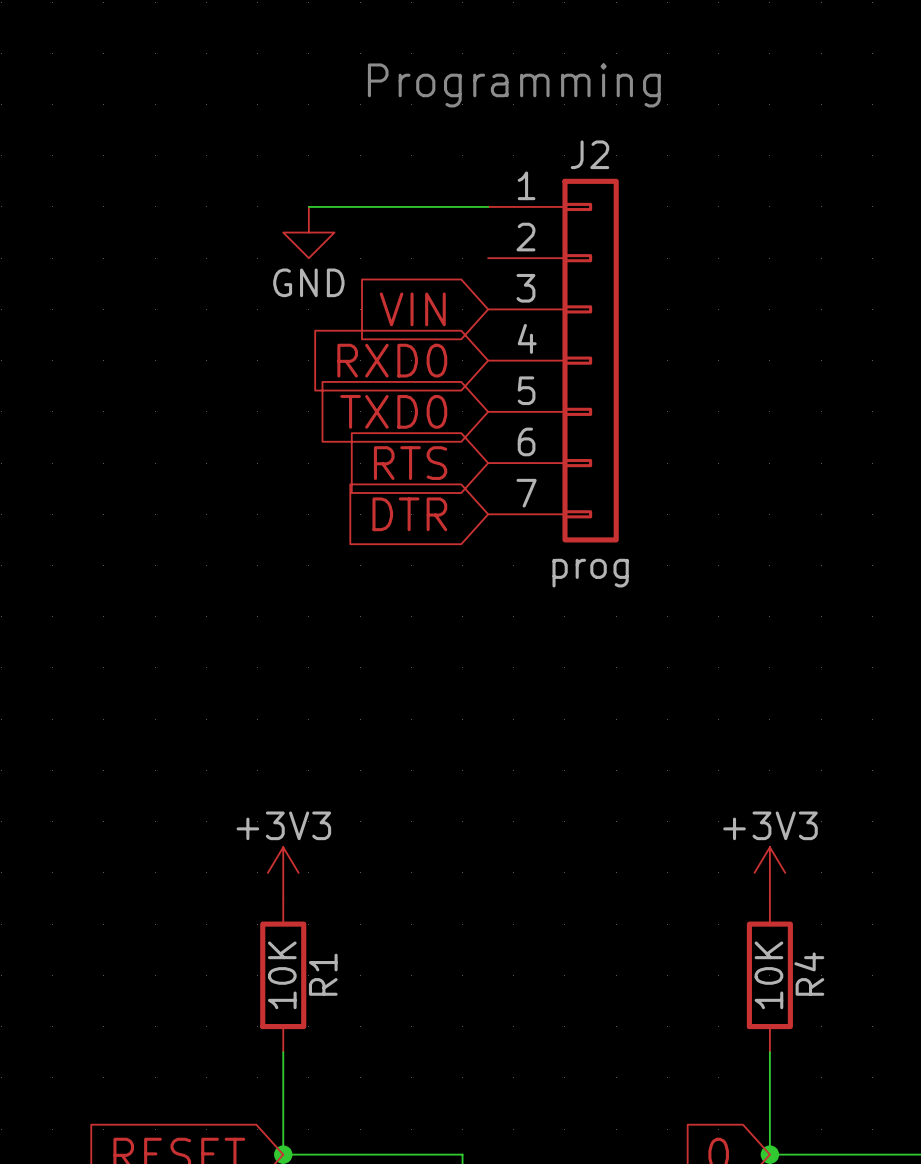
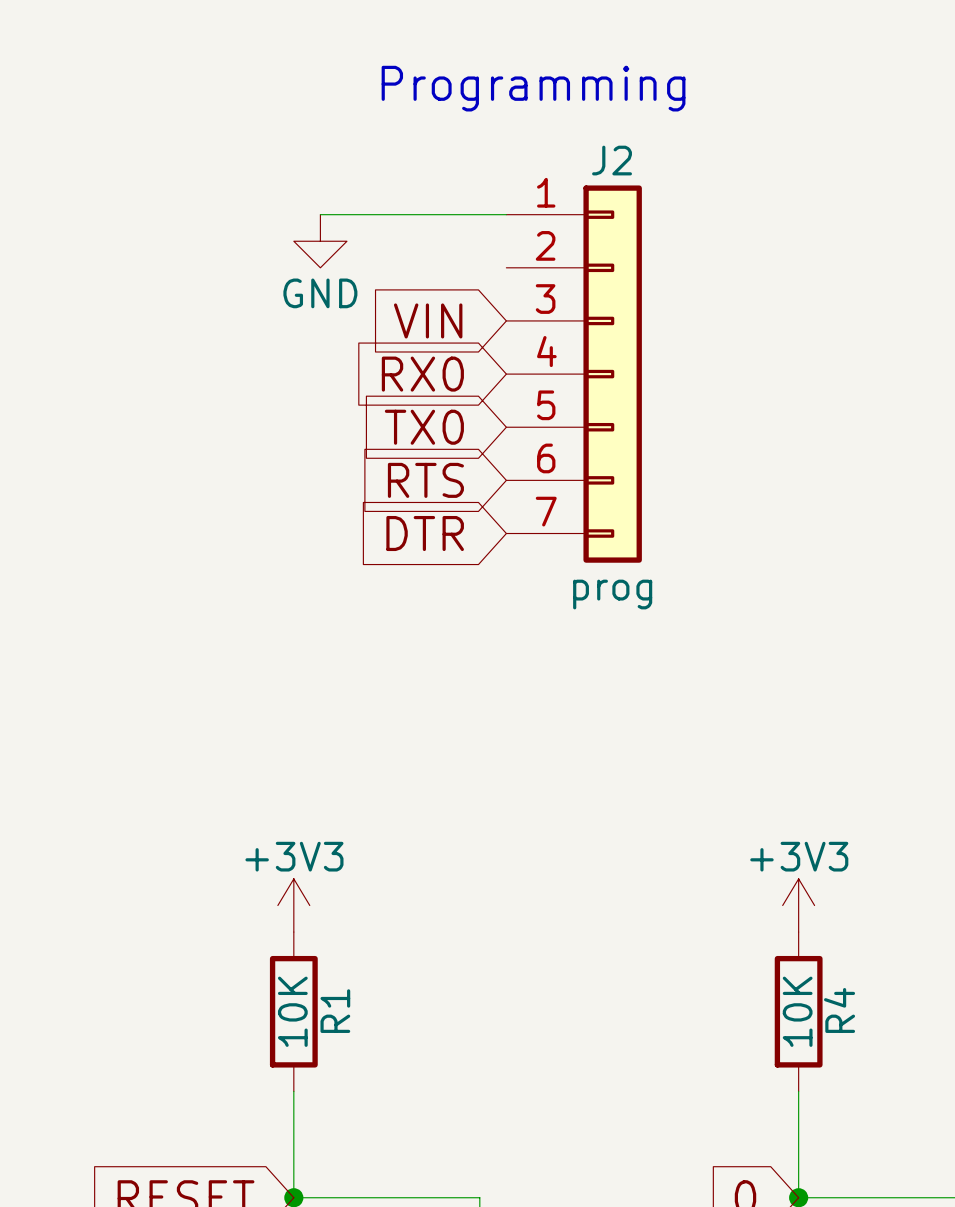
global label: RXD0 (392, 360) -> RX0 (422, 374)
global label: TXD0 (393, 411) -> TX0 (424, 427)

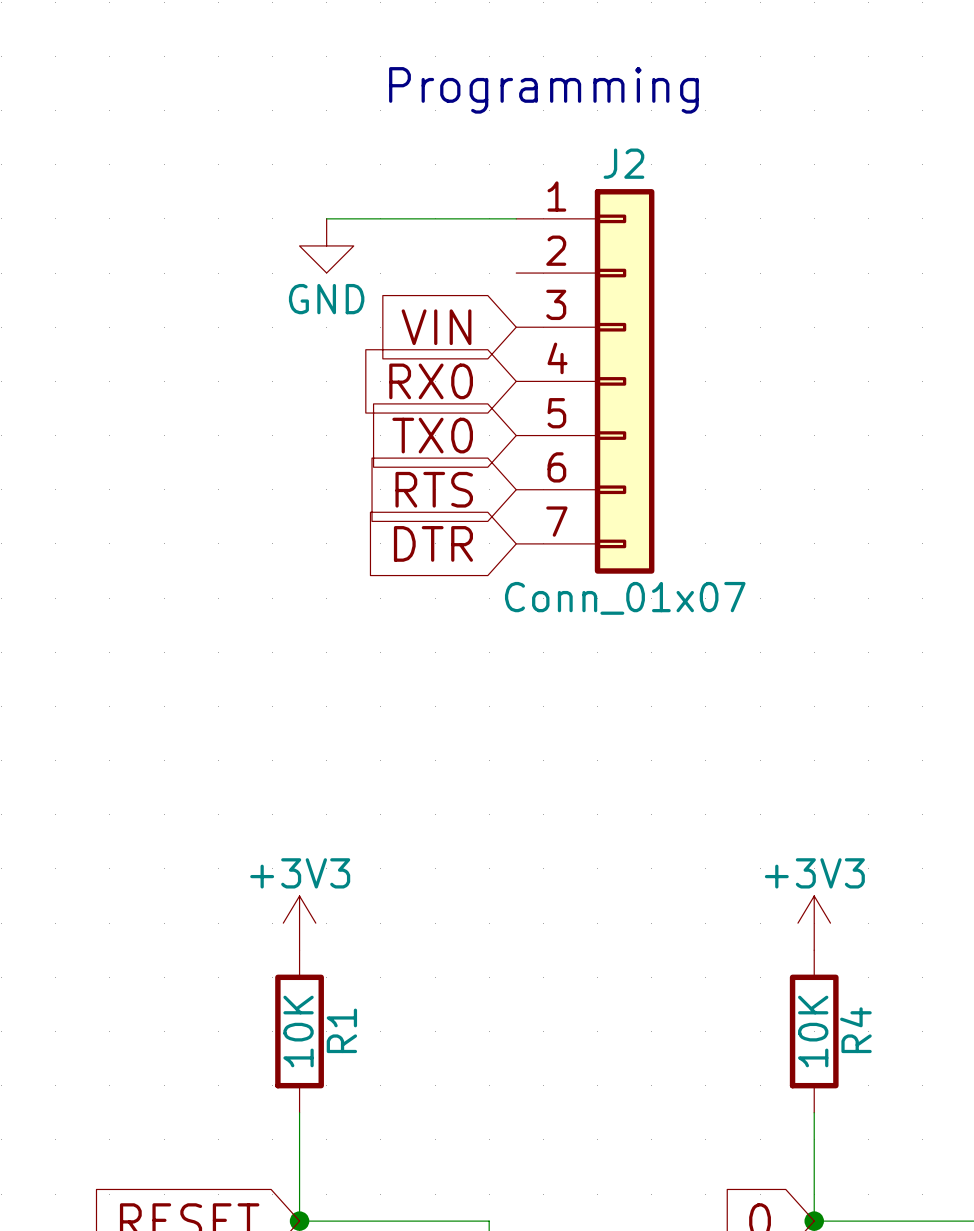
J2 value: prog (612, 594) -> Conn_01x07 (625, 598)

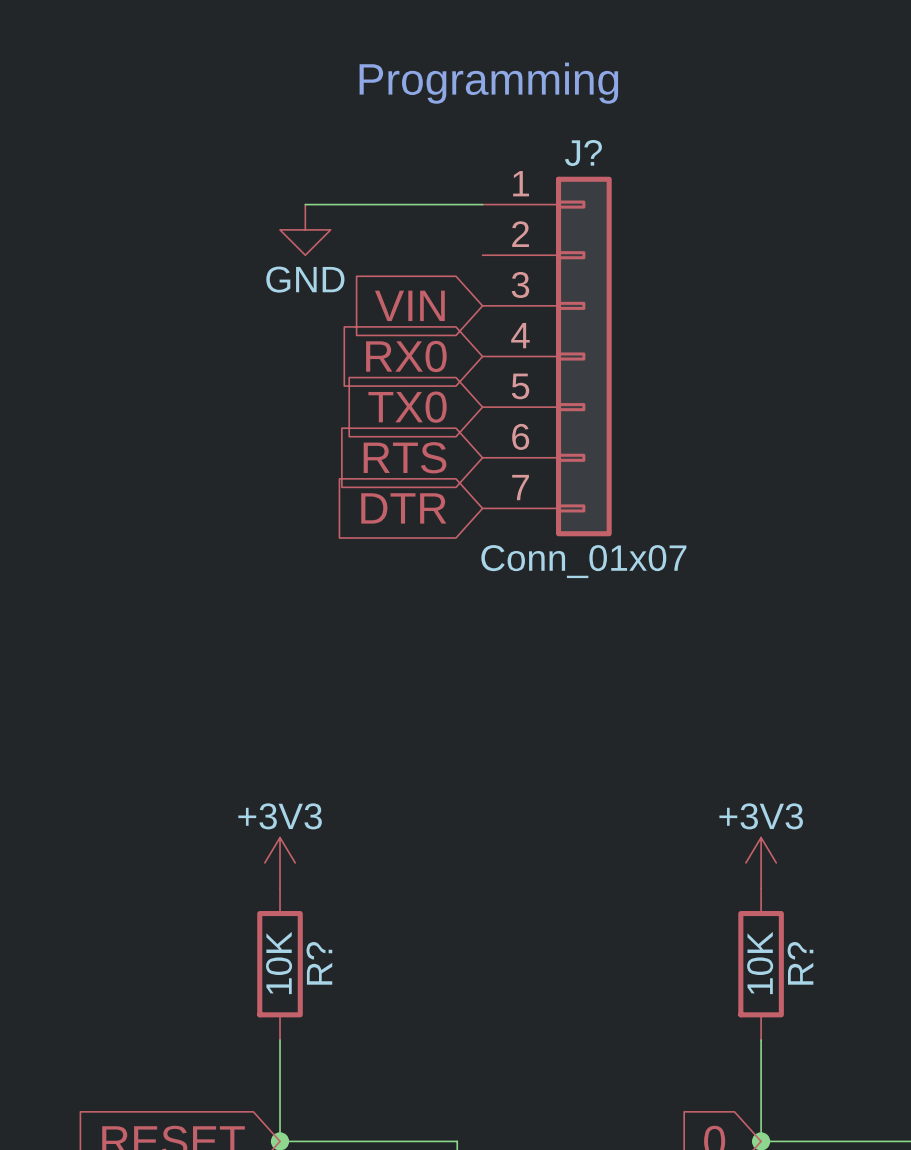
J2 name: J2 (623, 163) -> J? (583, 152)
R1 name: R1 (341, 1030) -> R? (319, 963)
R4 name: R4 (855, 1030) -> R? (800, 963)

